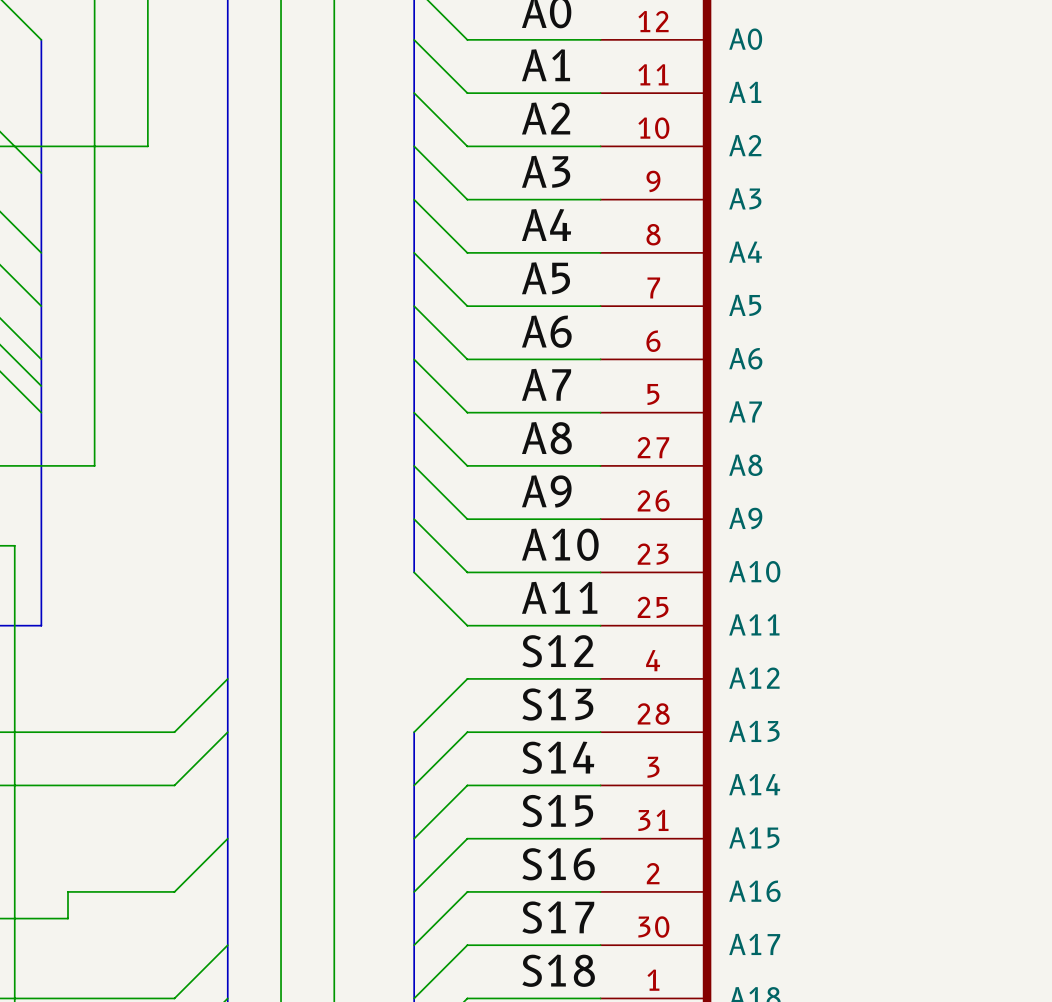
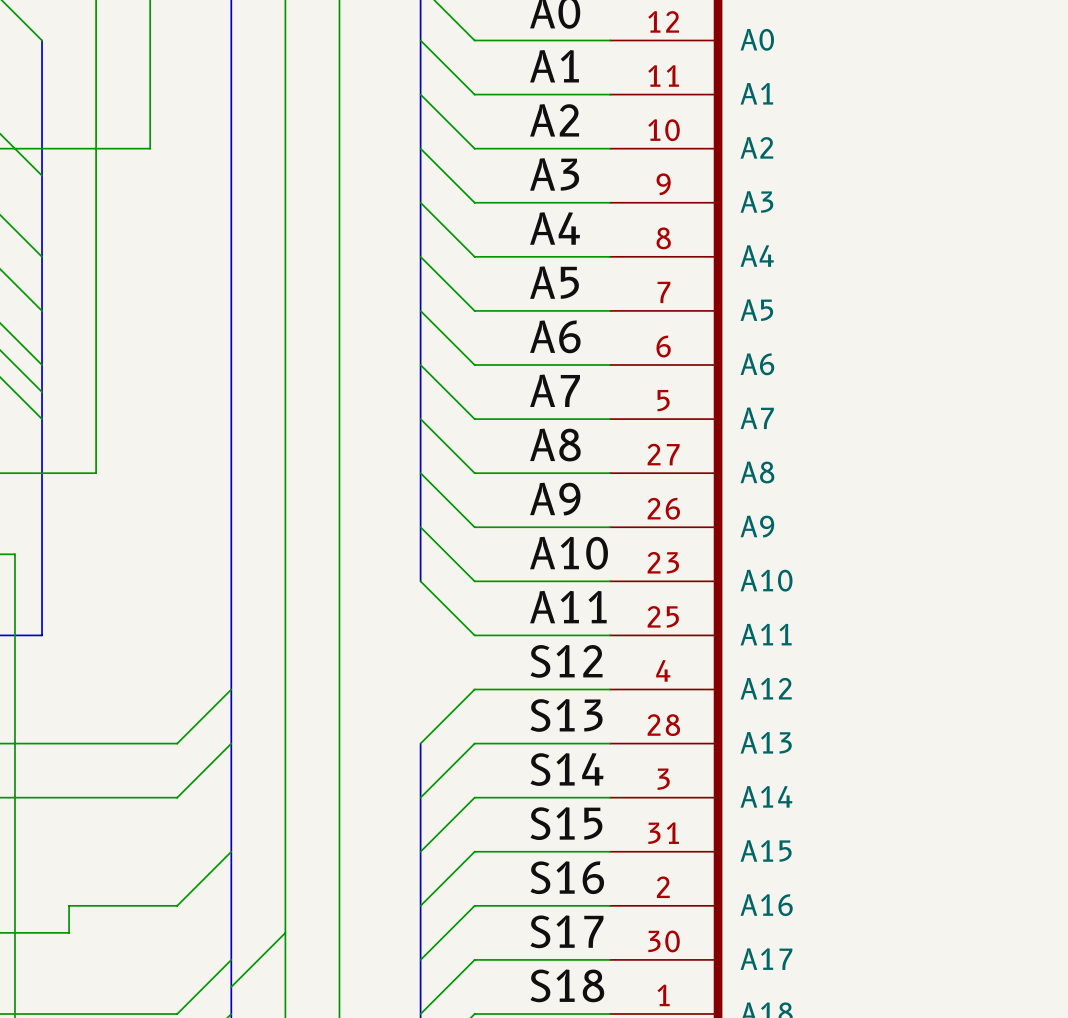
wire: none -> (285, 932) (231, 986)

